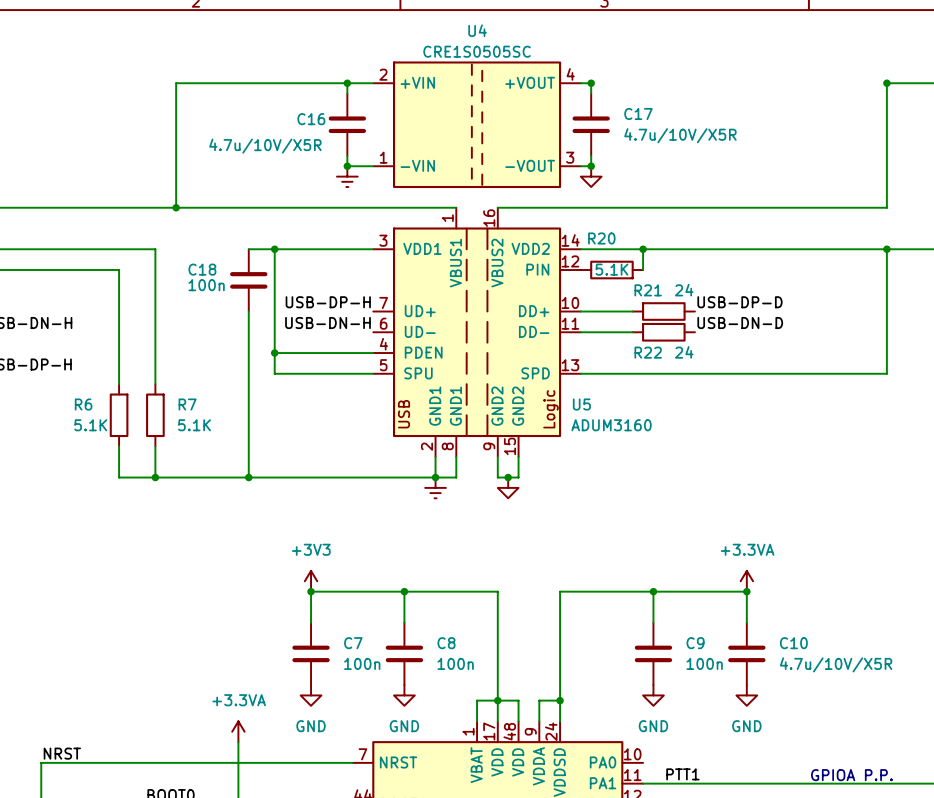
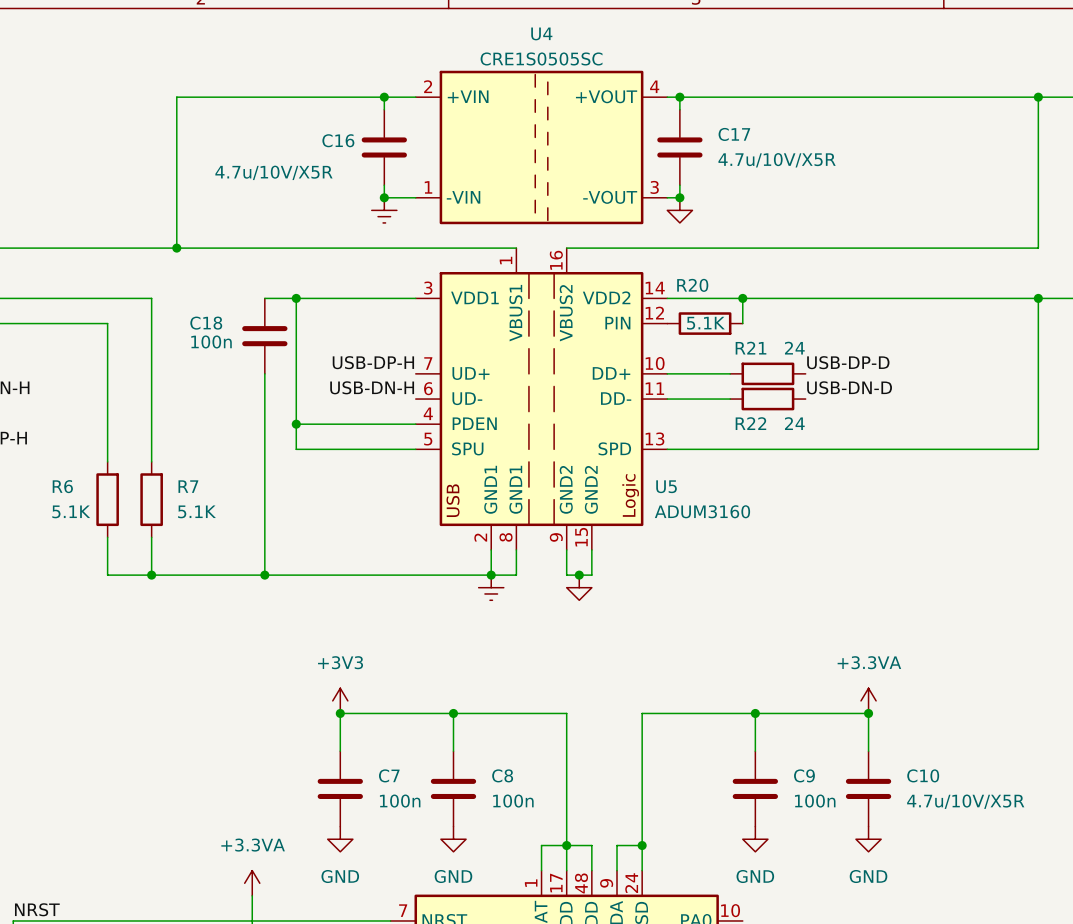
wire: none -> (679, 97) (1038, 97)

